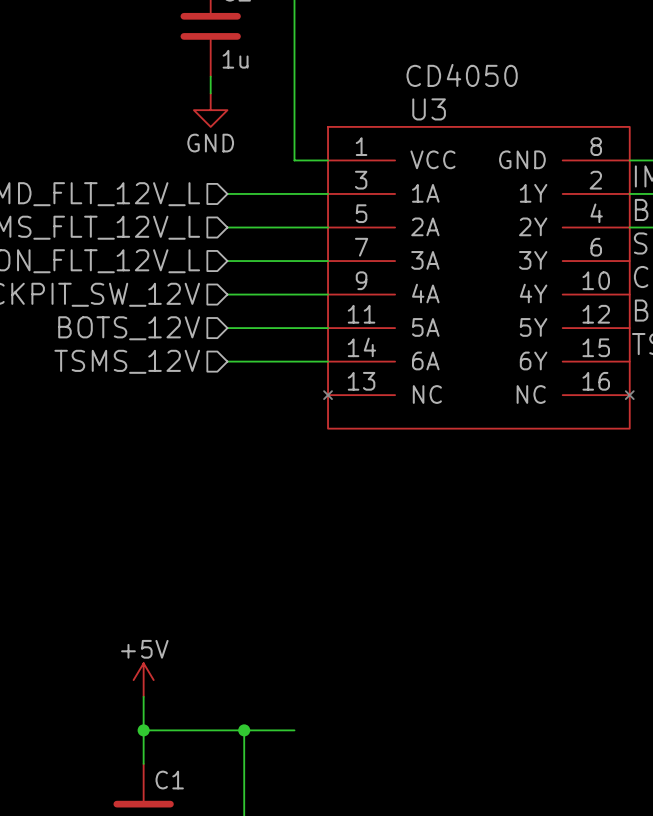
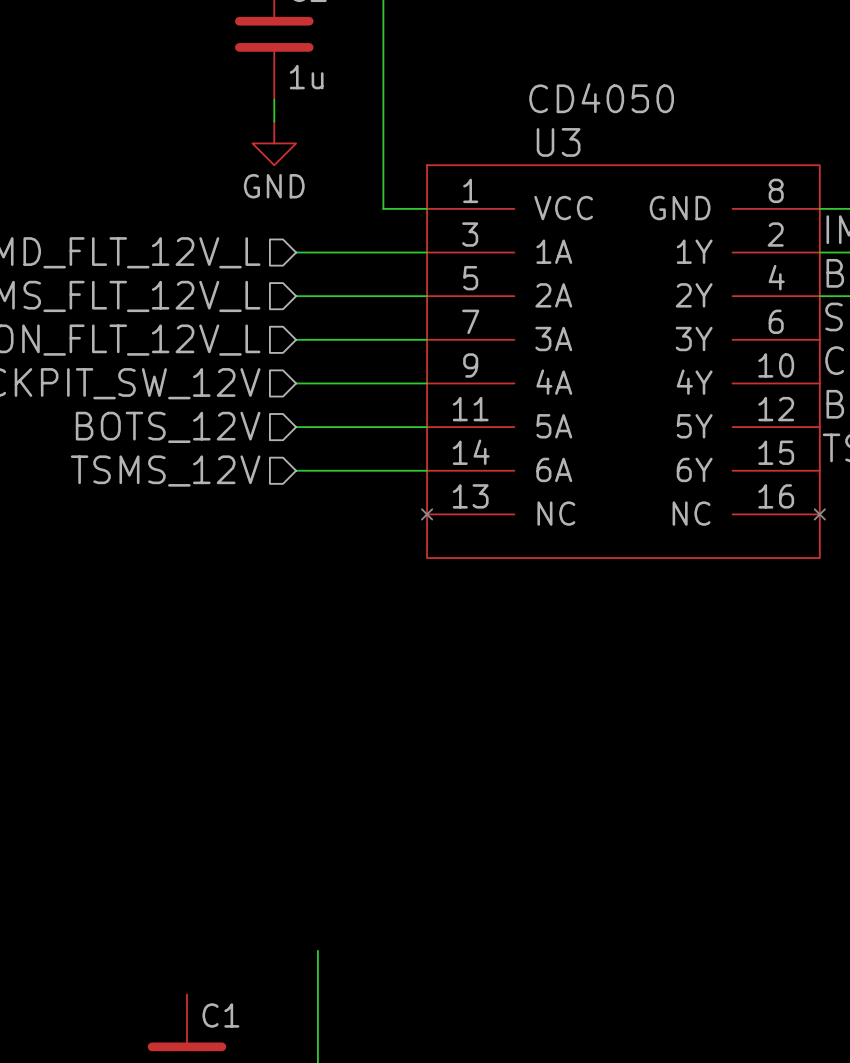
power symbol: +5V (143, 680) -> none
wire: (143, 696) (143, 763) -> none
wire: (143, 730) (294, 730) -> none
junction: (143, 730) -> none
junction: (244, 730) -> none

